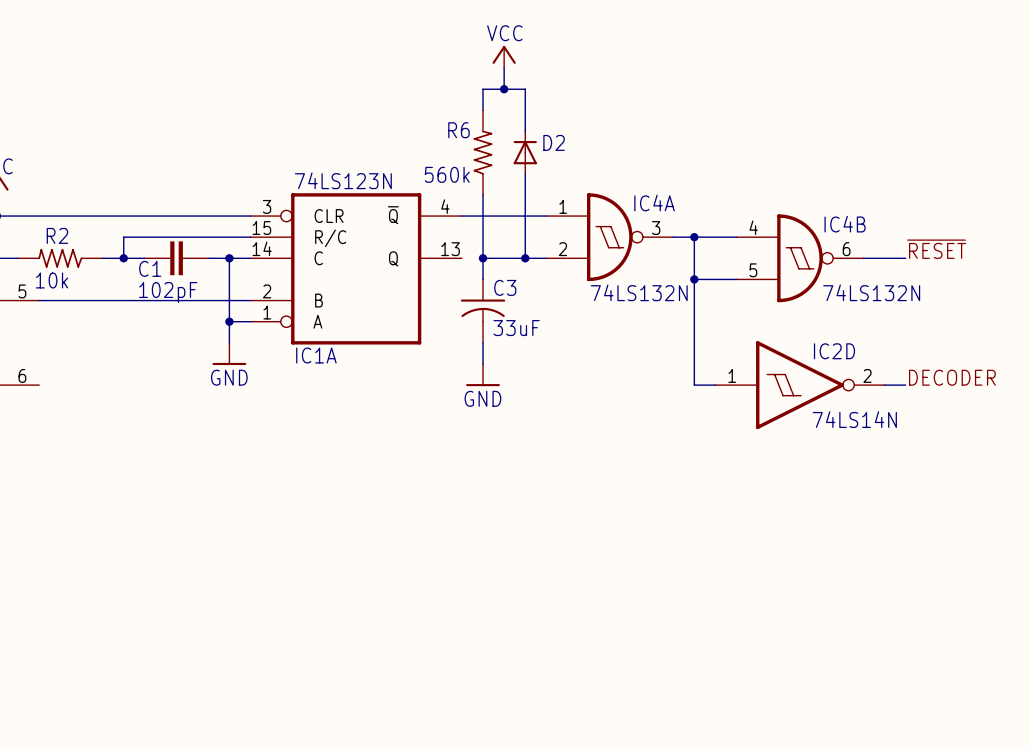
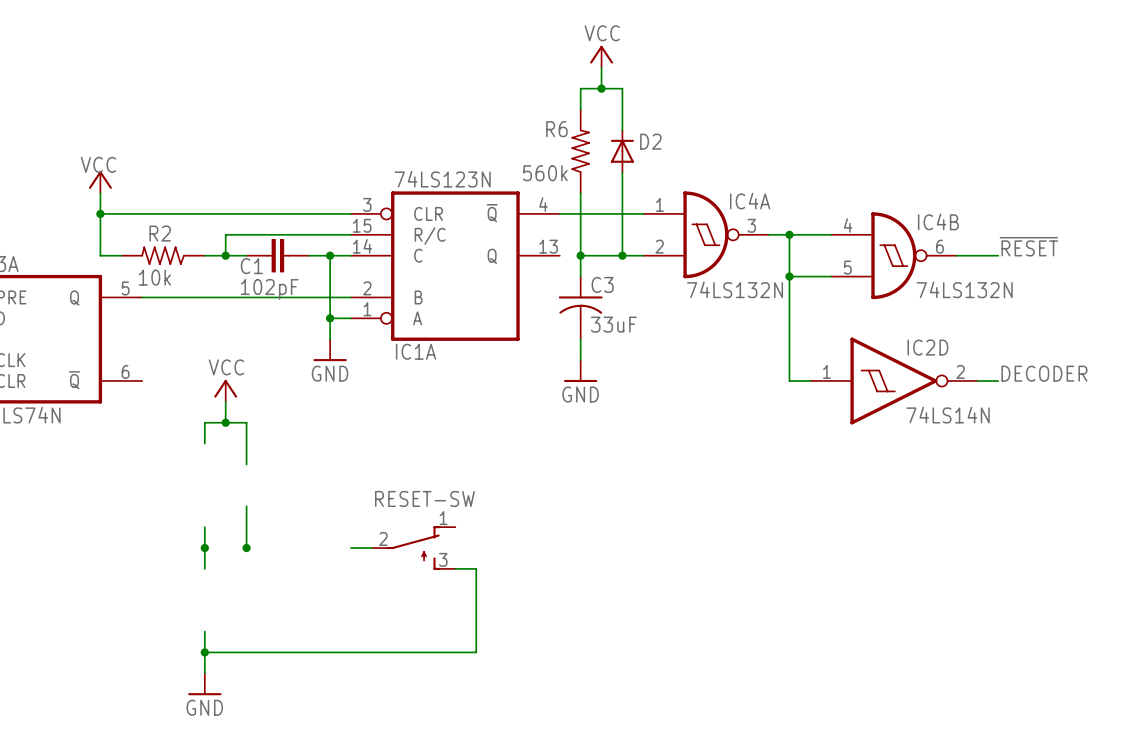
power symbol: none -> VCC (225, 390)
wire: none -> (225, 401) (225, 422)
junction: none -> (225, 422)
wire: none -> (204, 443) (204, 422) (246, 422) (246, 464)
wire: none -> (246, 506) (246, 548)
wire: none -> (204, 527) (204, 568)
junction: none -> (204, 548)
junction: none -> (246, 548)
wire: none -> (350, 548) (371, 548)
RESET-SW: none -> (413, 548)
wire: none -> (455, 568) (476, 568) (476, 652) (204, 652)
wire: none -> (204, 631) (204, 673)
junction: none -> (204, 652)
power symbol: none -> GND (204, 684)

